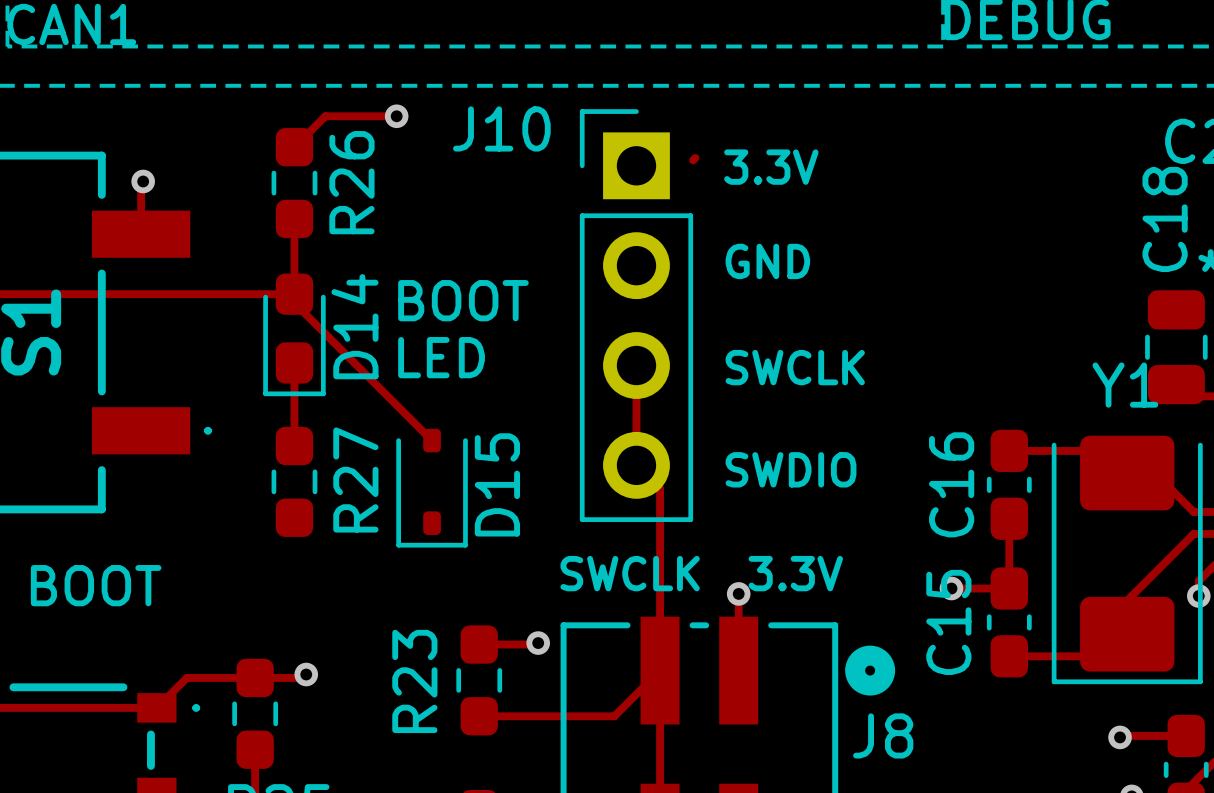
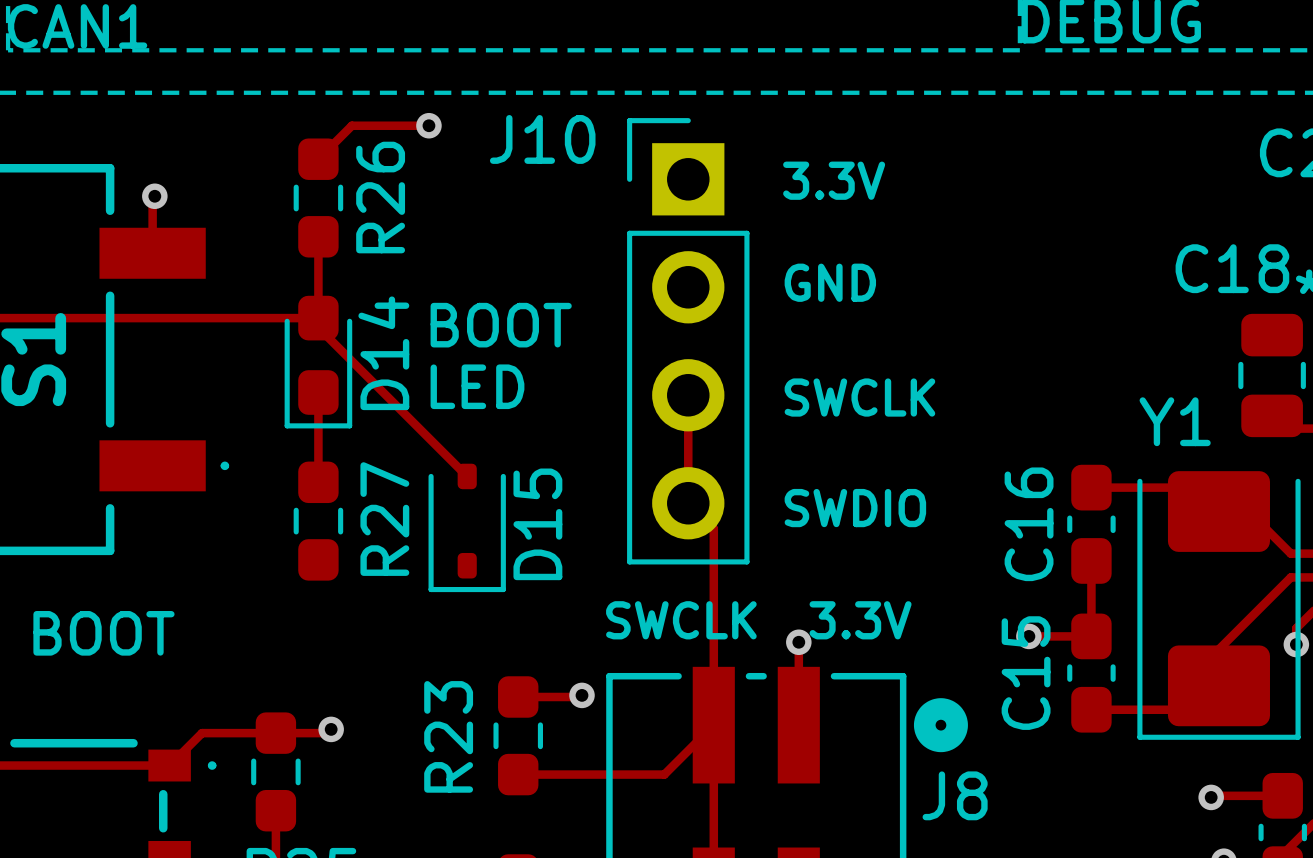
track: (695, 157) (693, 160) -> none
C18 name rotation: 0° (1165, 219) -> 90° clockwise (1232, 268)
Y1 name position: Y1 (1125, 385) -> Y1 (1175, 421)

